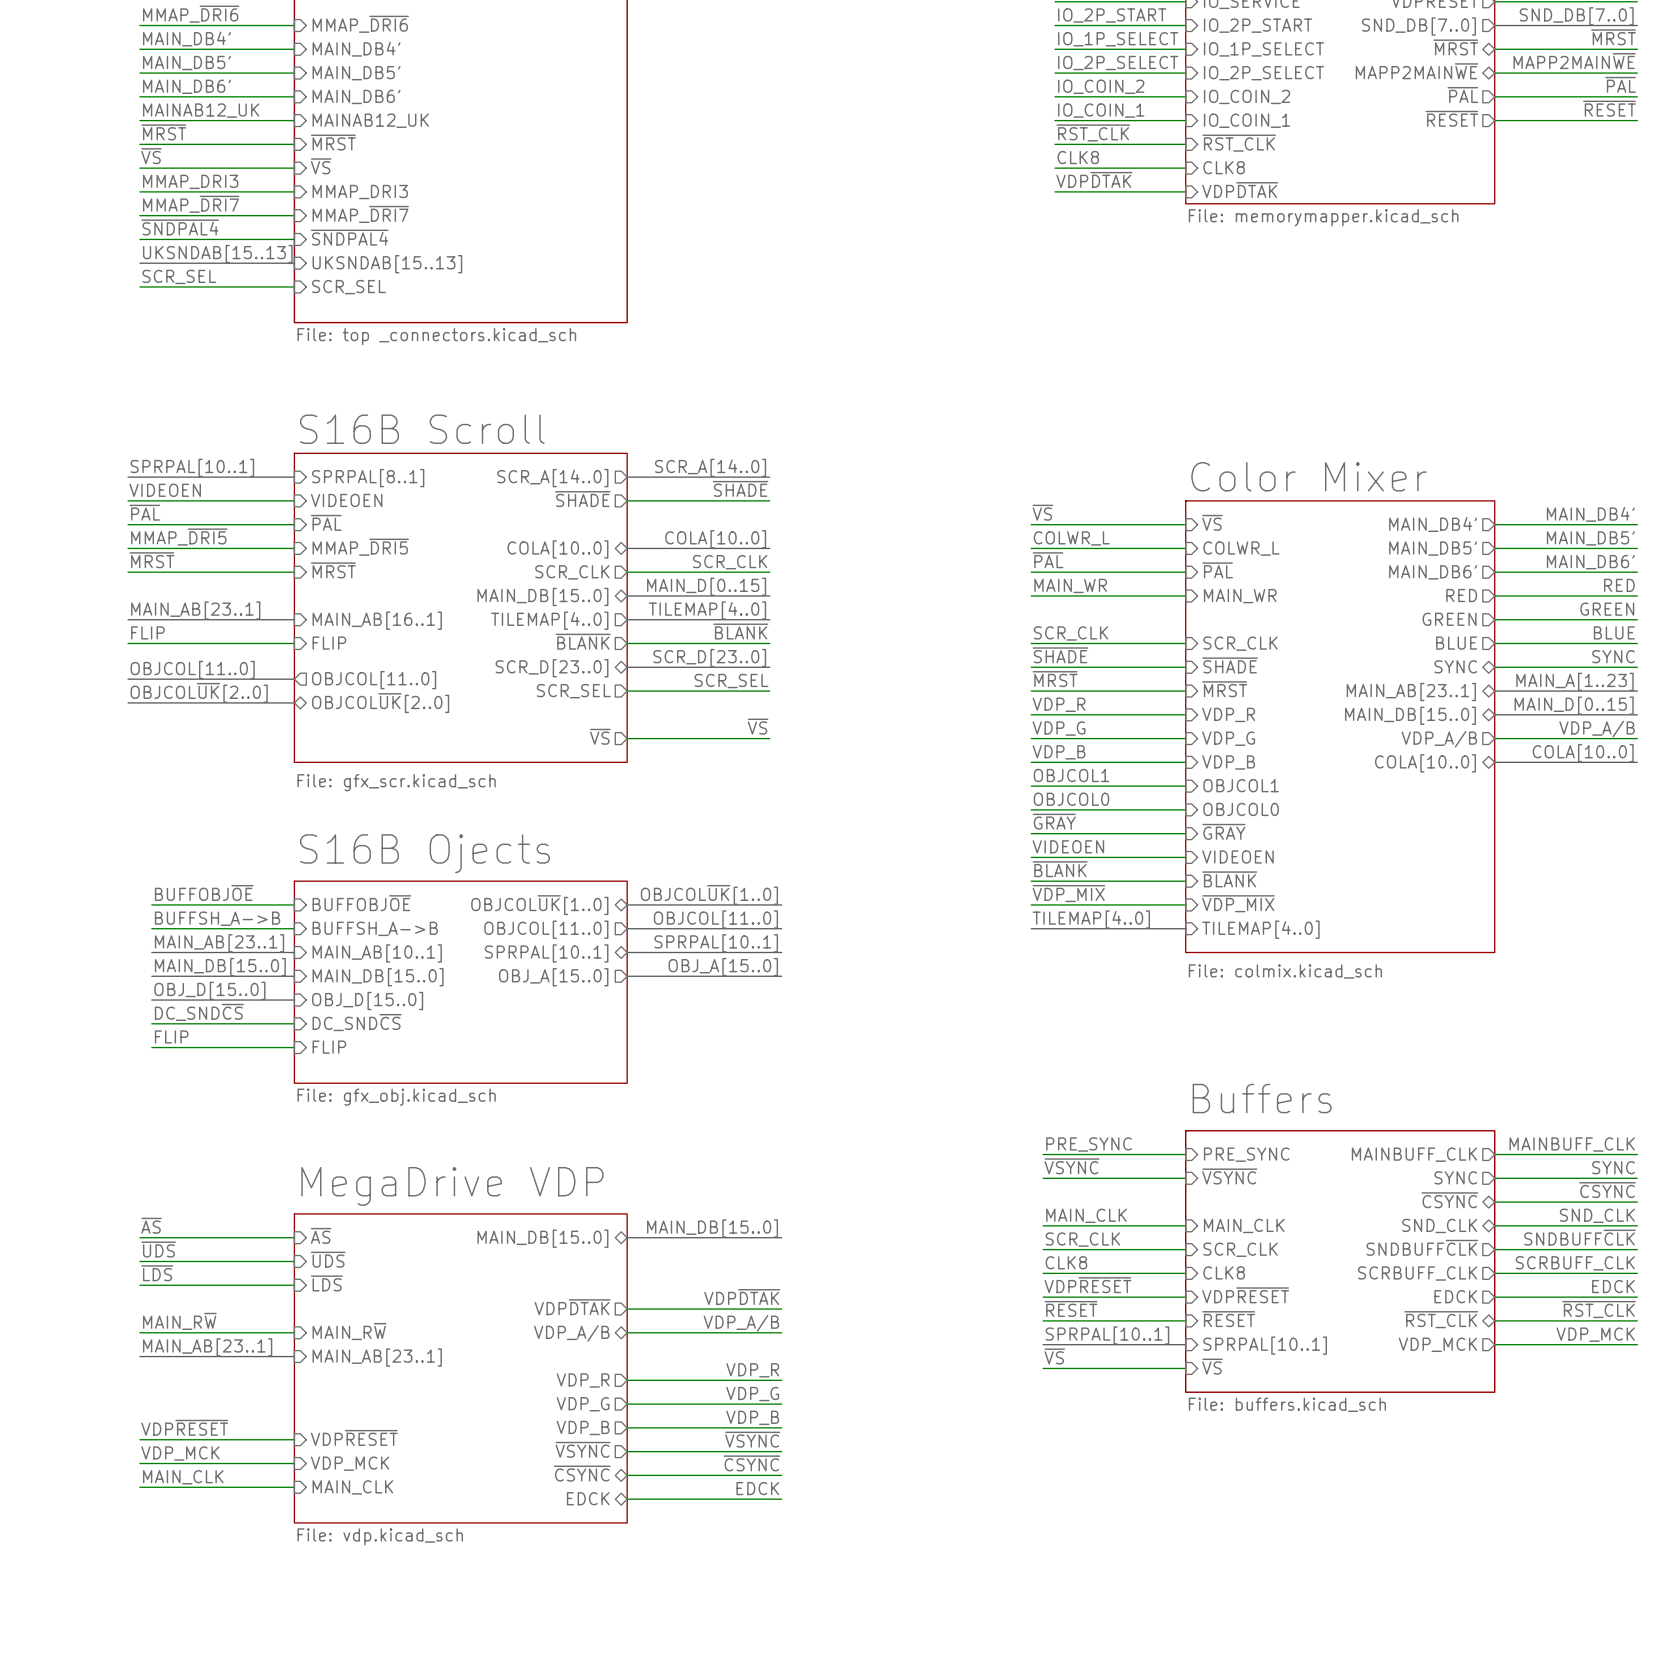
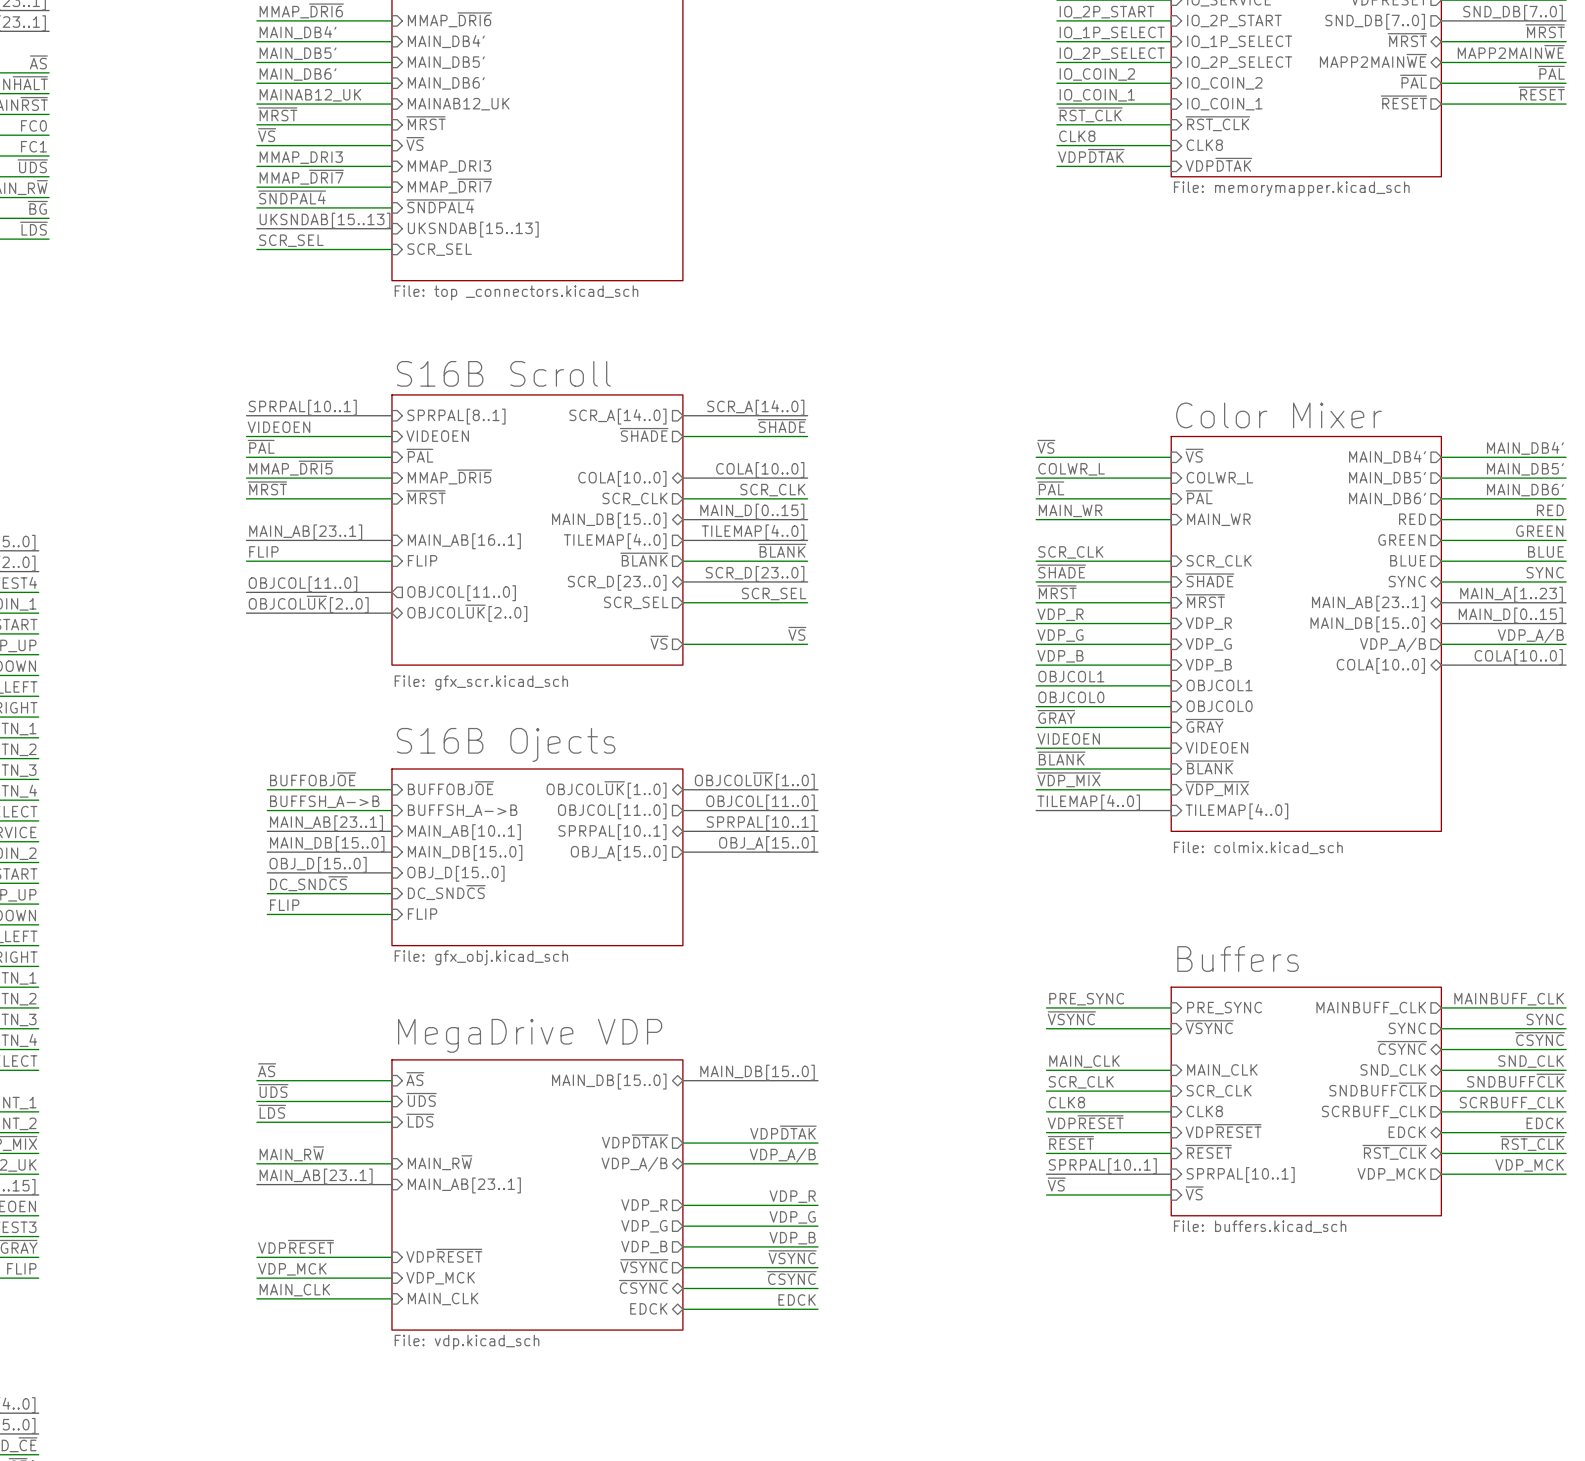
sheet pin shape: output (1455, 1296) -> bidirectional (1407, 1132)

